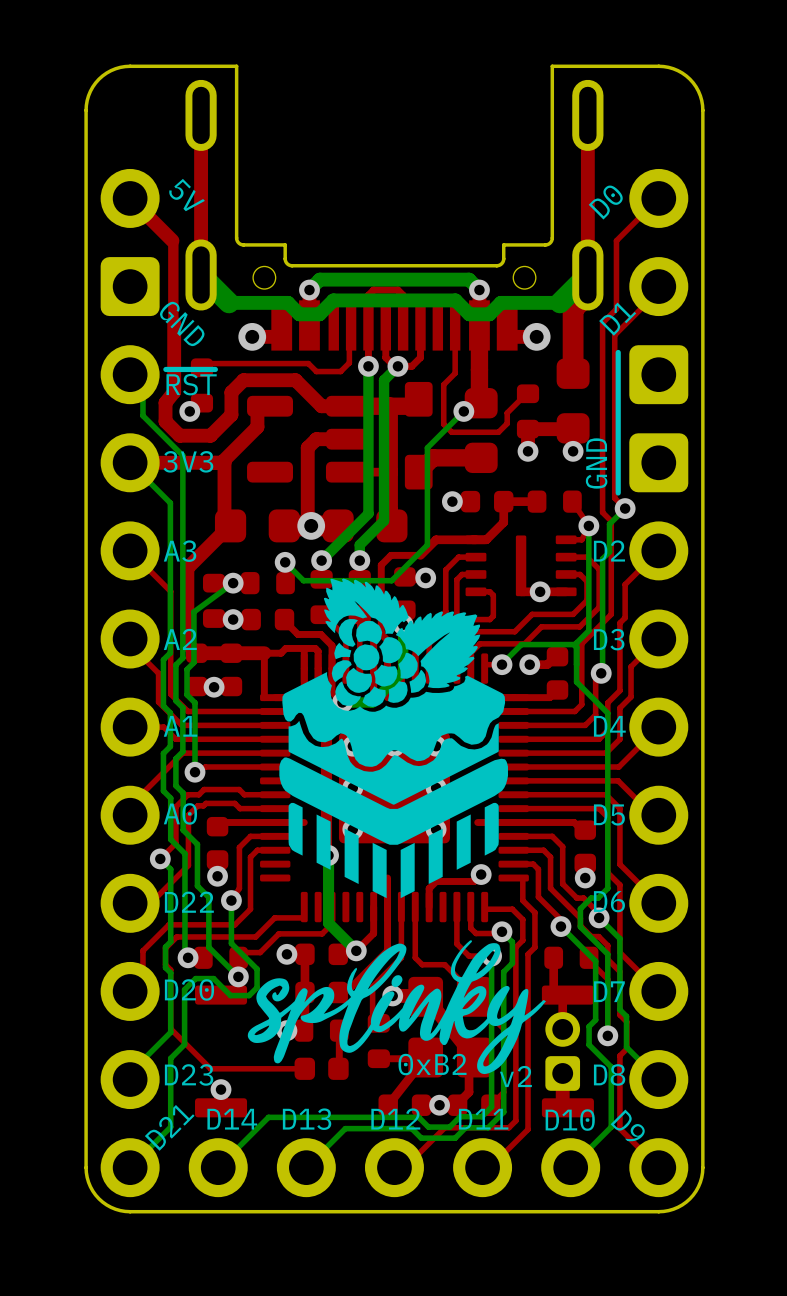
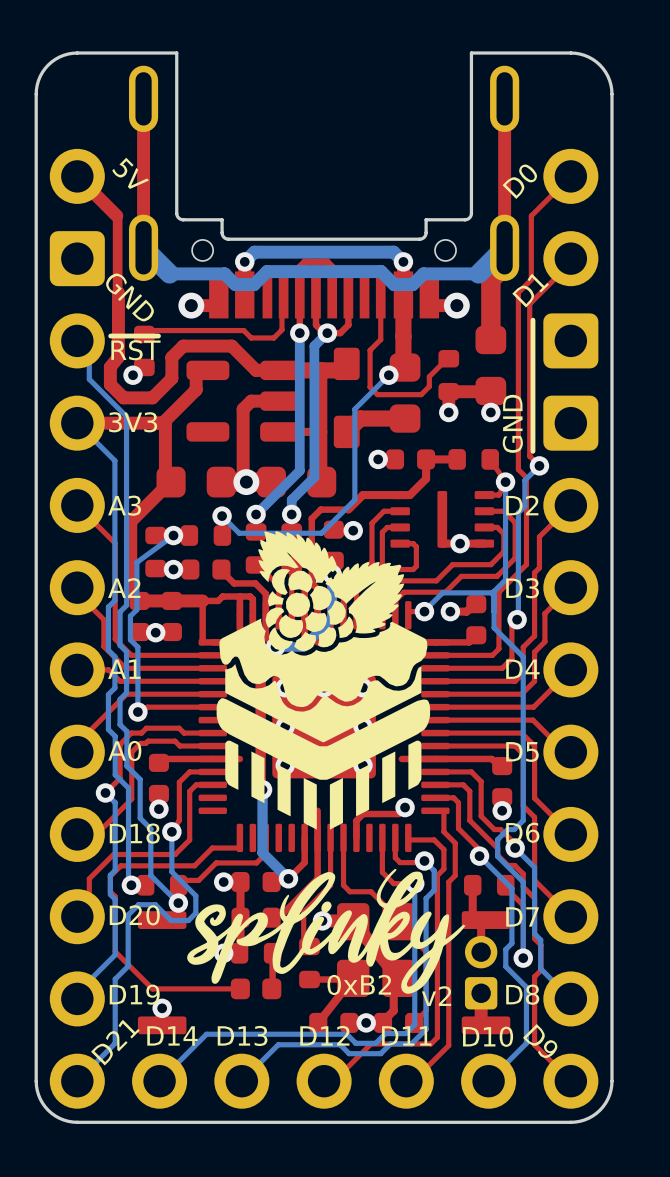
part text: D22 (189, 902) -> D18 (134, 833)
part text: D23 (189, 1074) -> D19 (134, 994)

